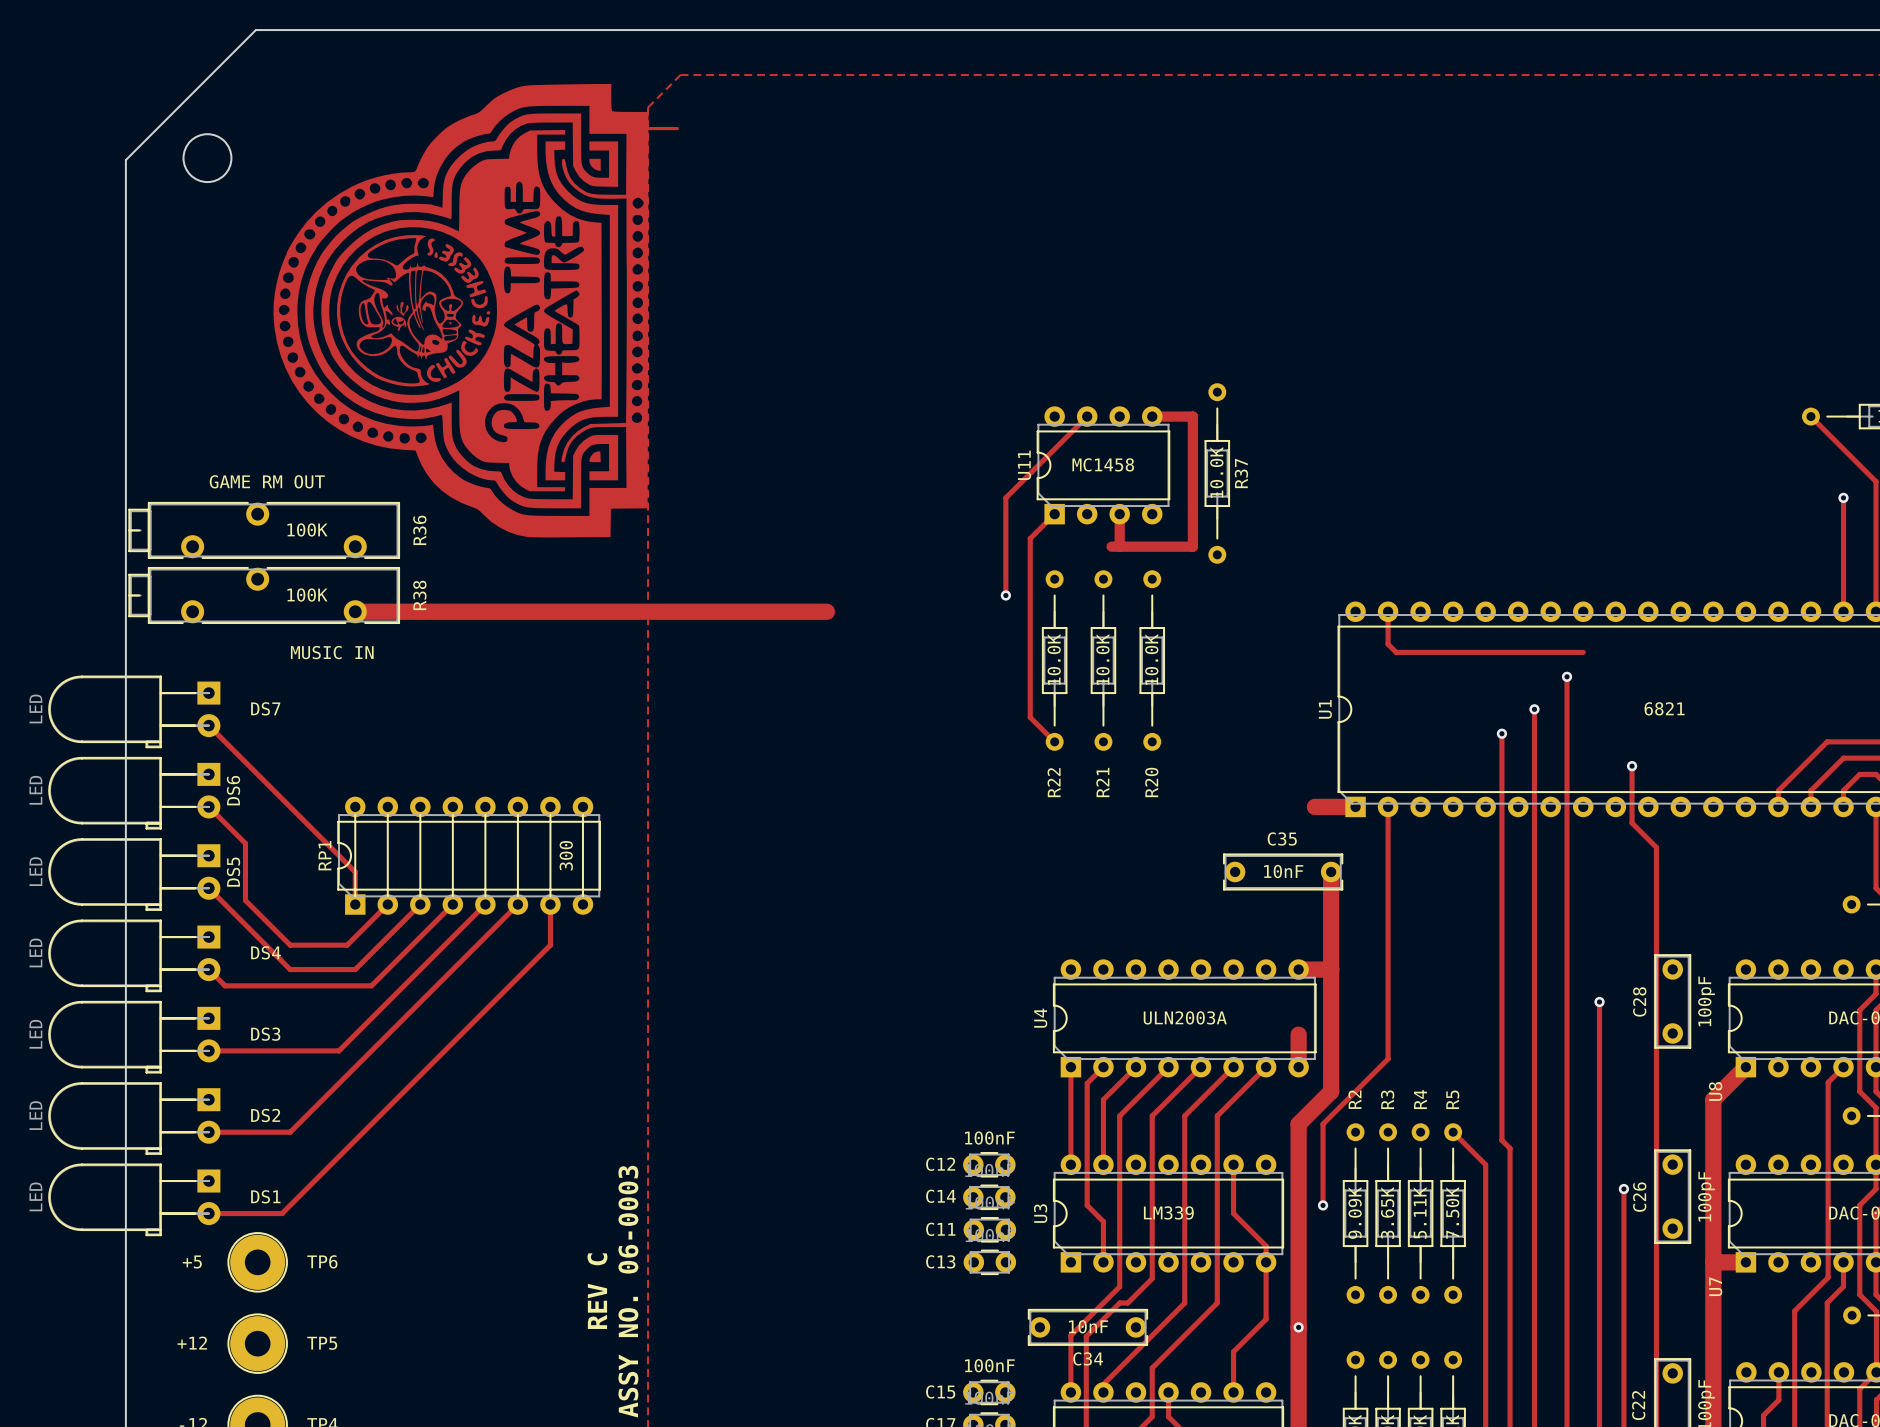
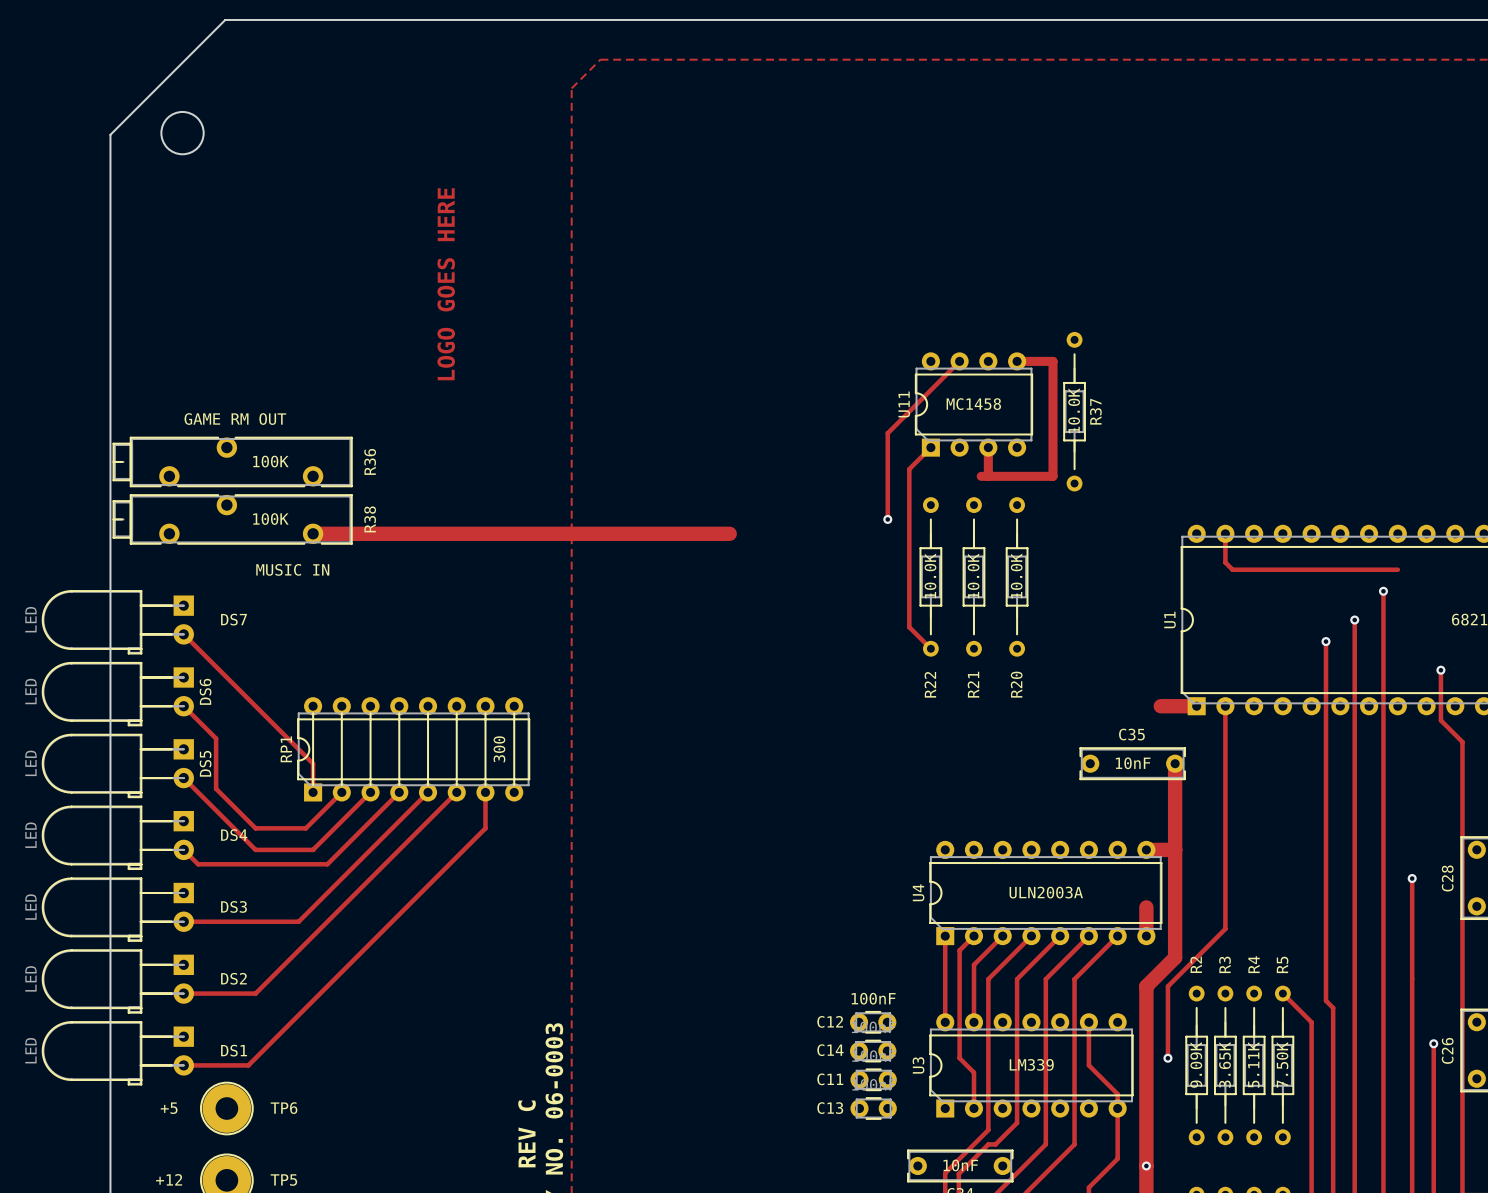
track: (640, 128) (677, 128) -> none
part: (460, 310) -> none
text: none -> LOGO GOES HERE (446, 284)

